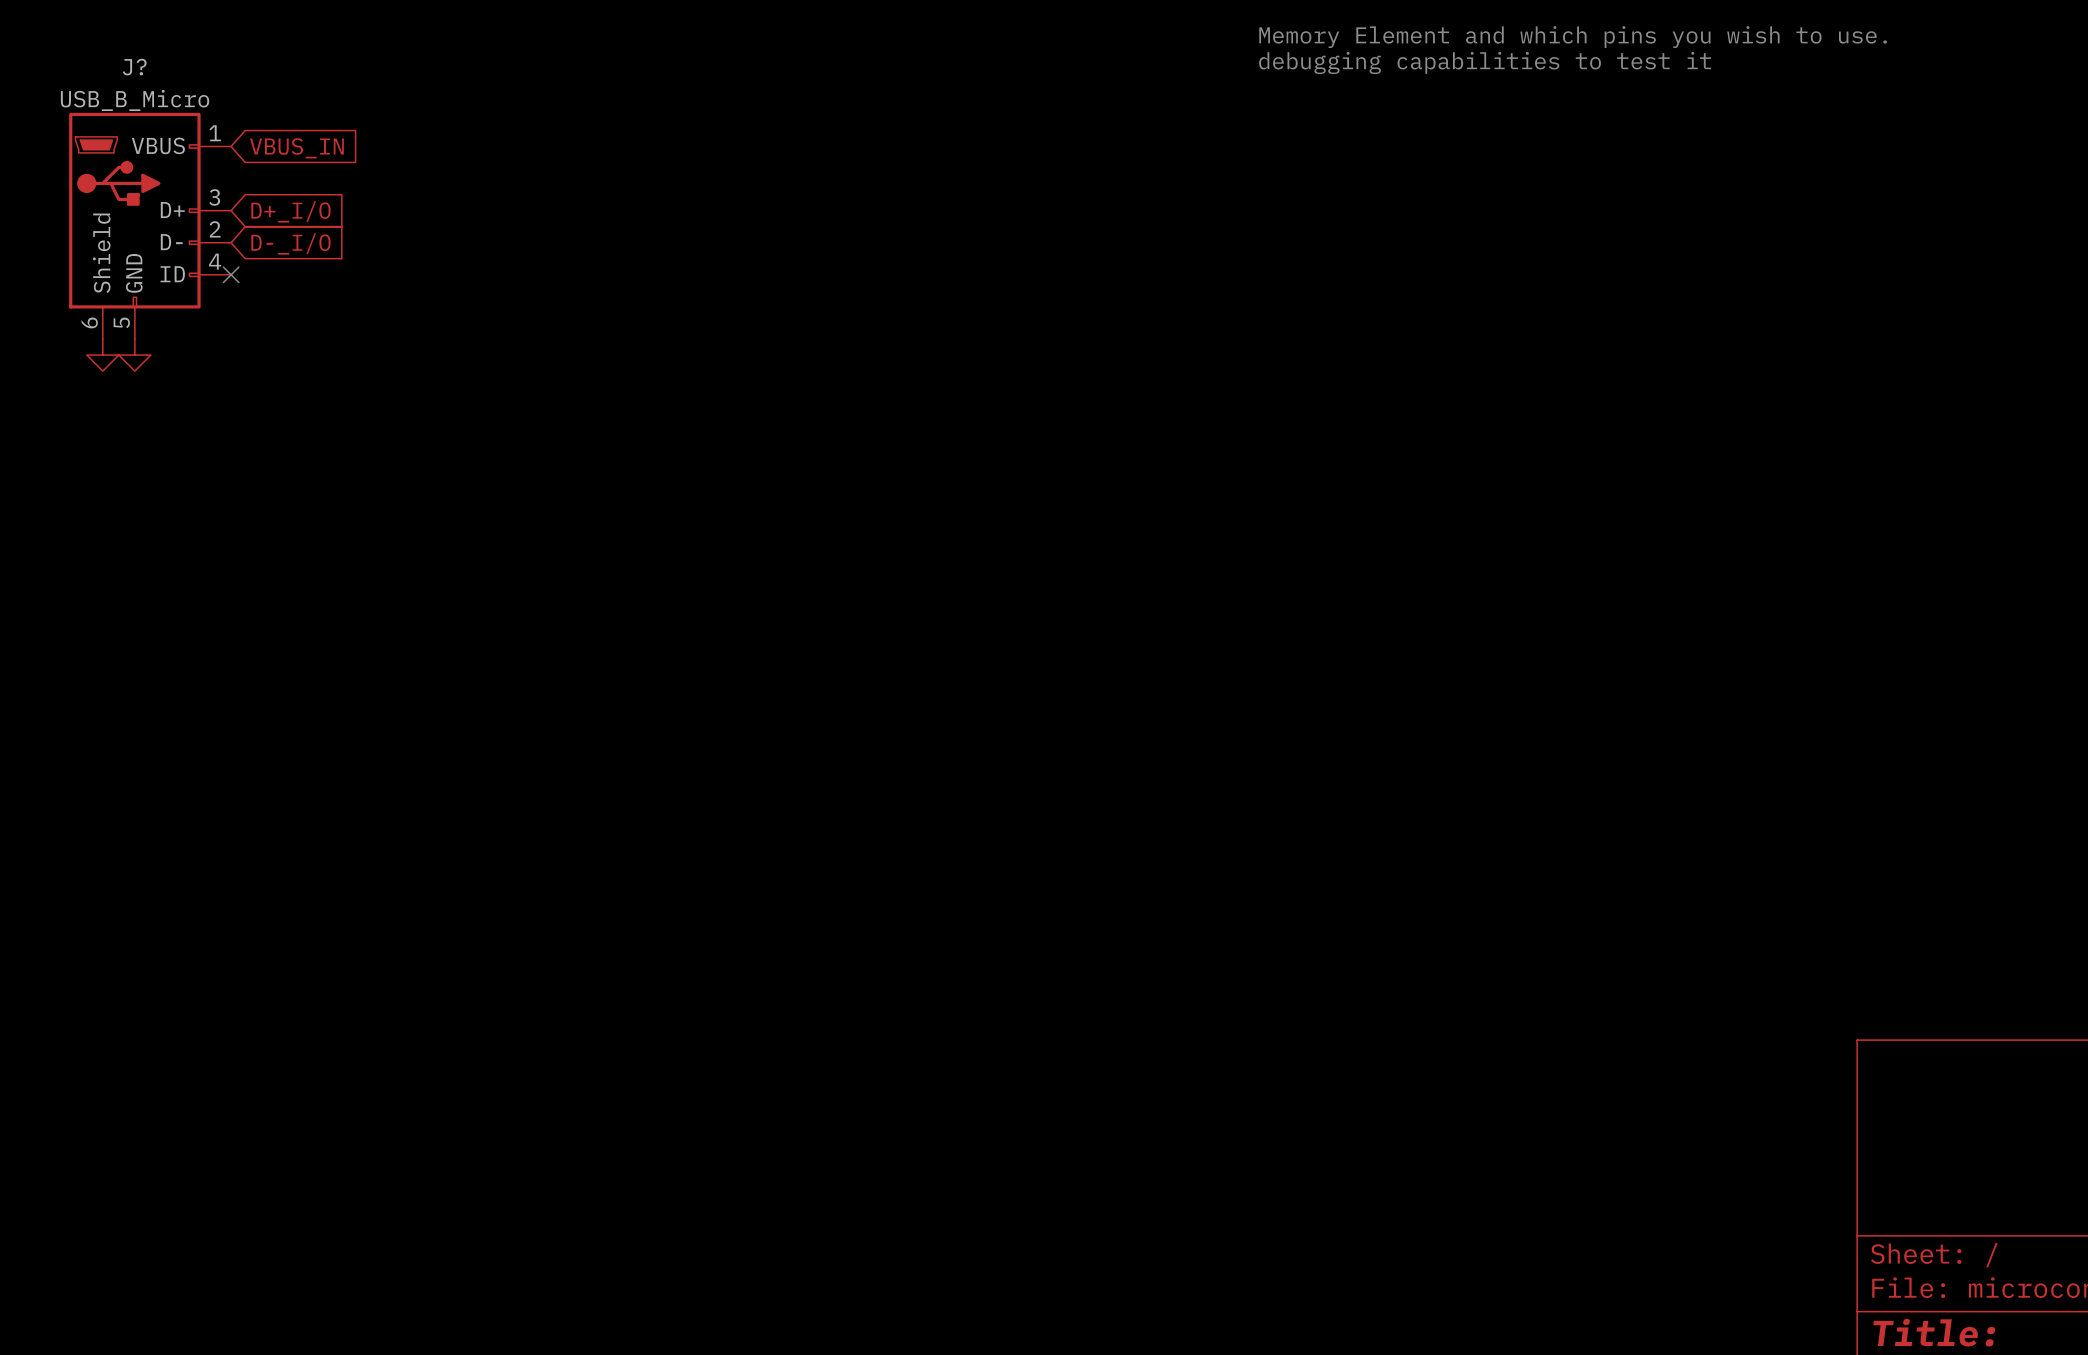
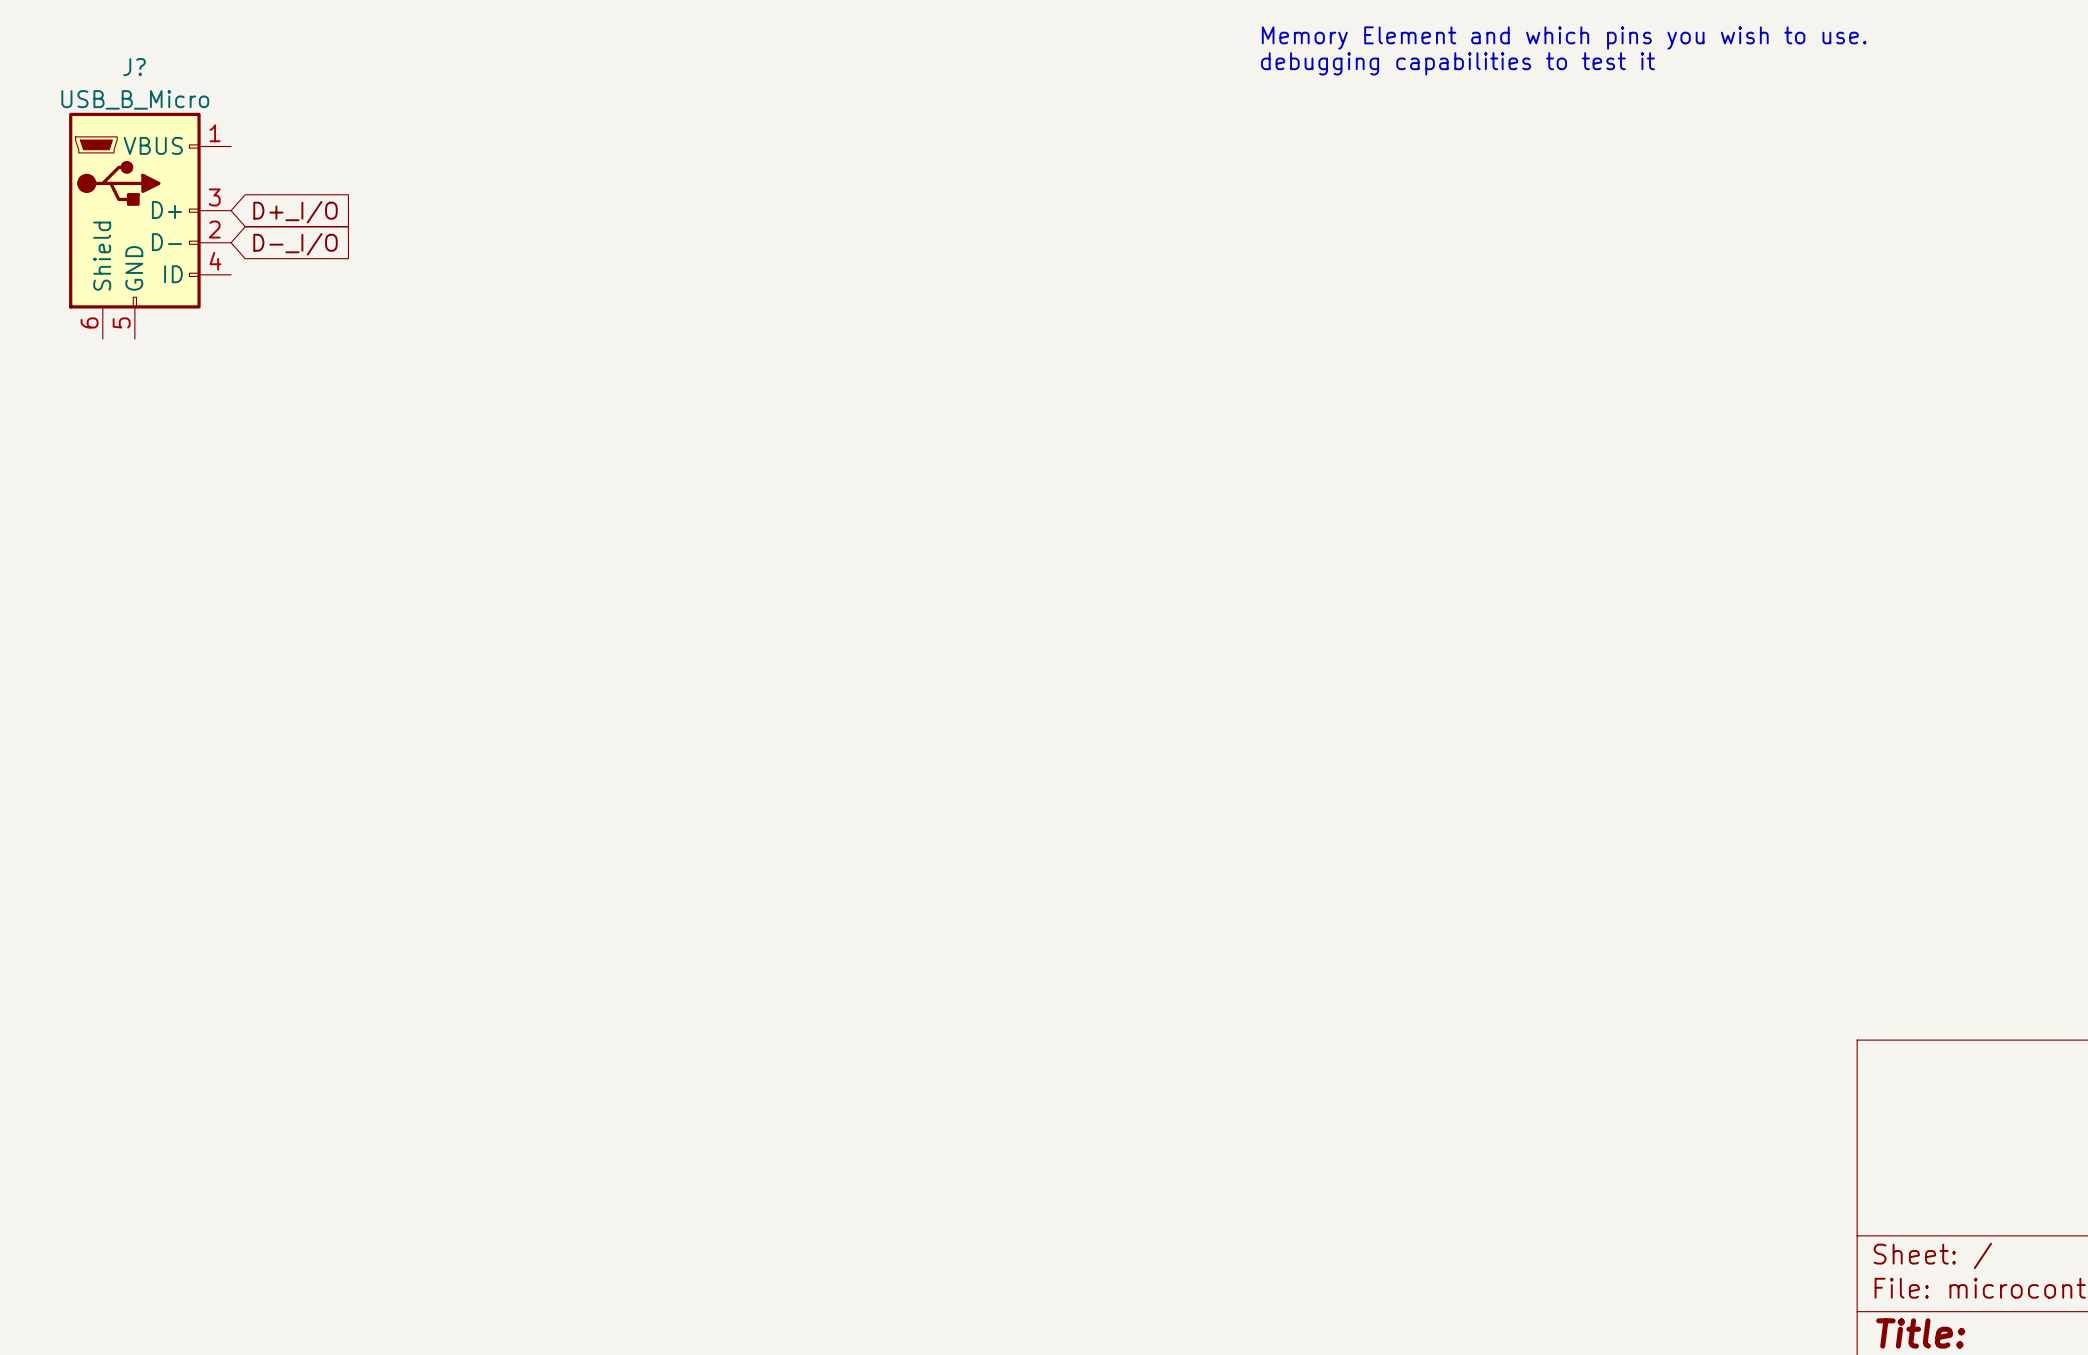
global label: VBUS_IN (296, 148) -> none
no-connect mark: (231, 274) -> none
power symbol: (102, 355) -> none
power symbol: (134, 355) -> none

